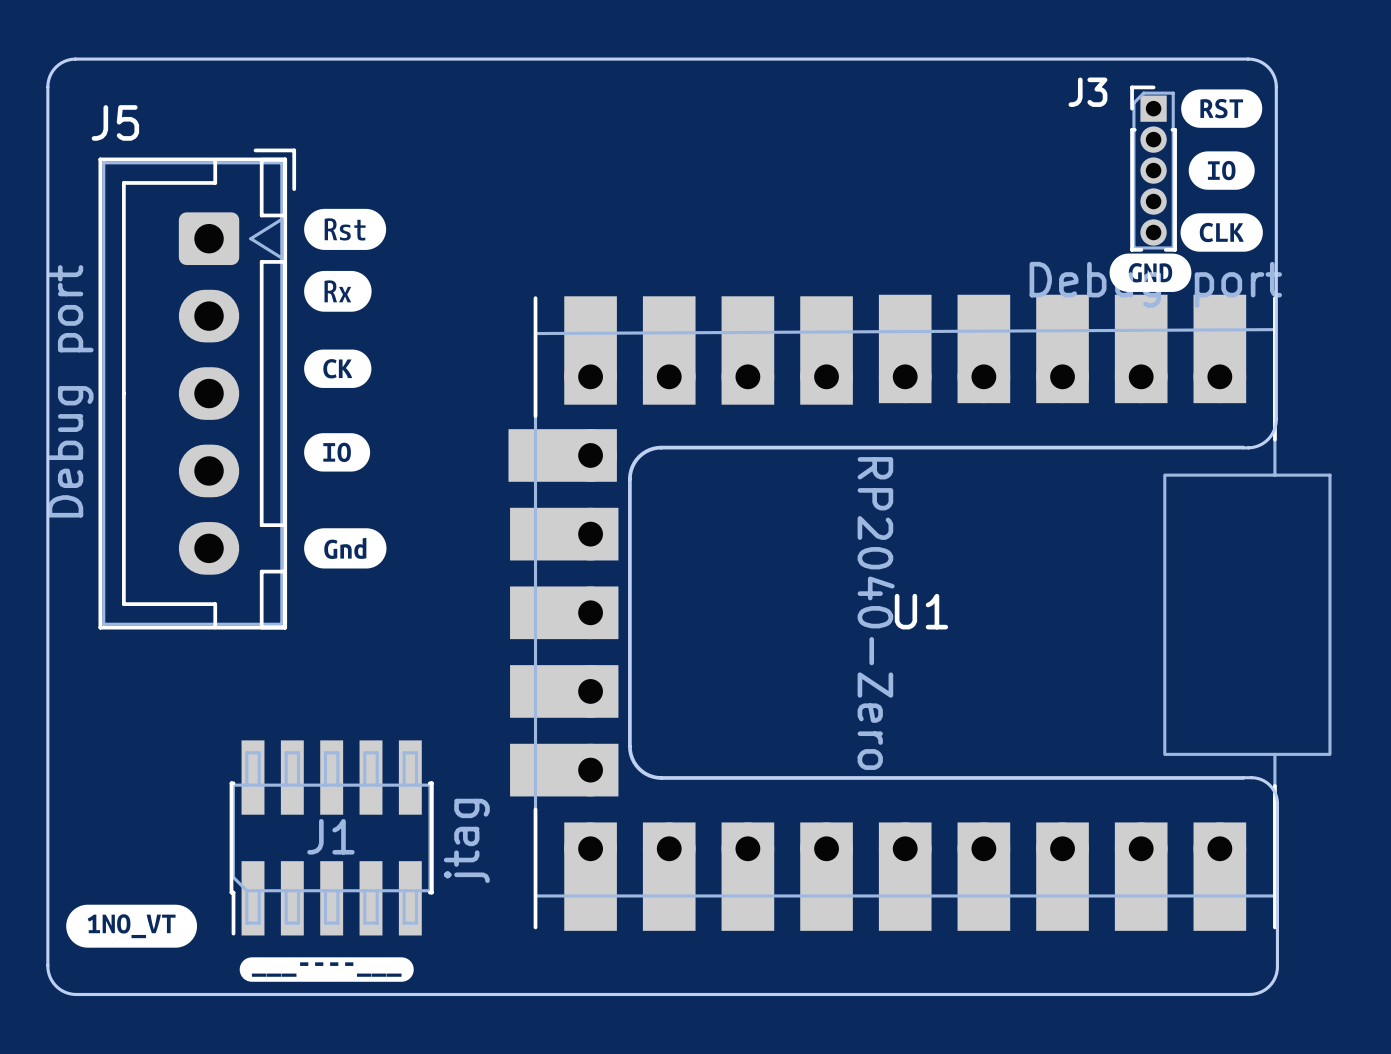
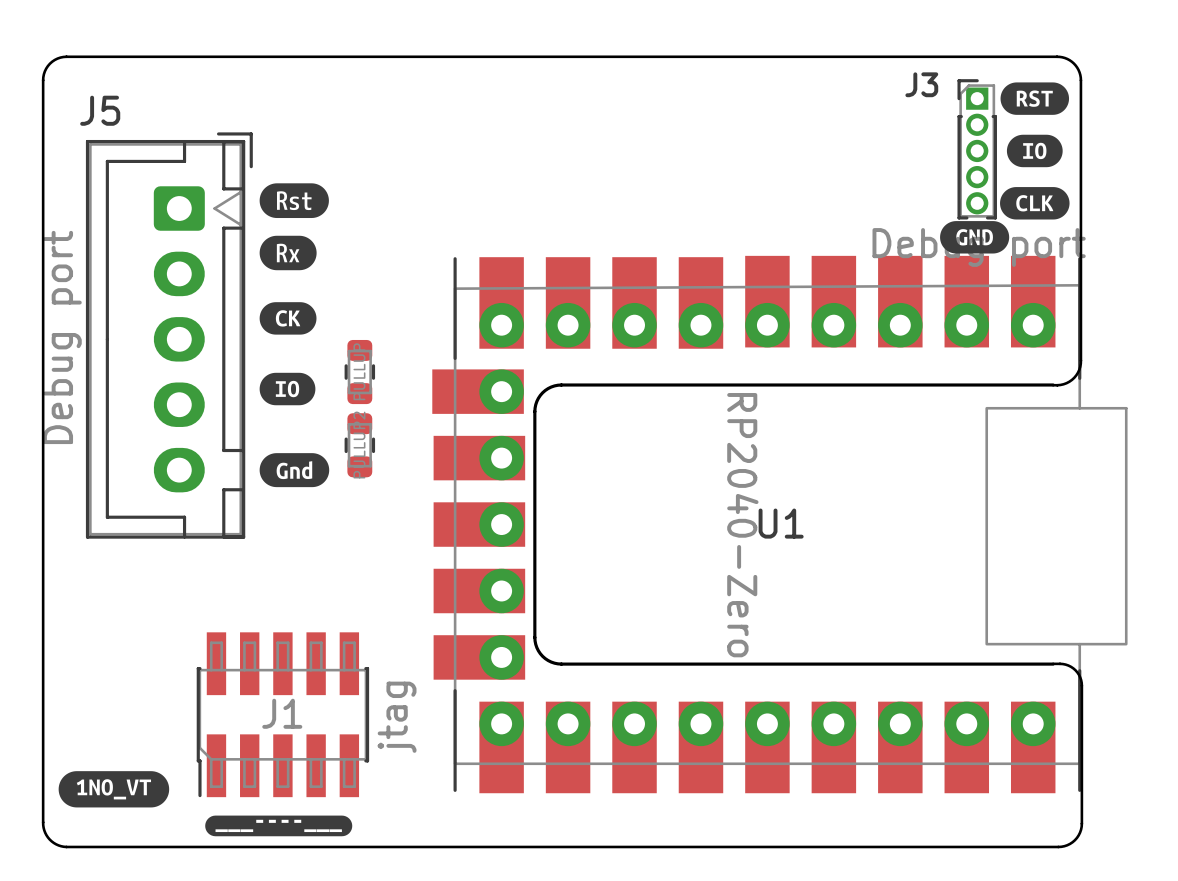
part: none -> (359, 372)
part: none -> (359, 445)

